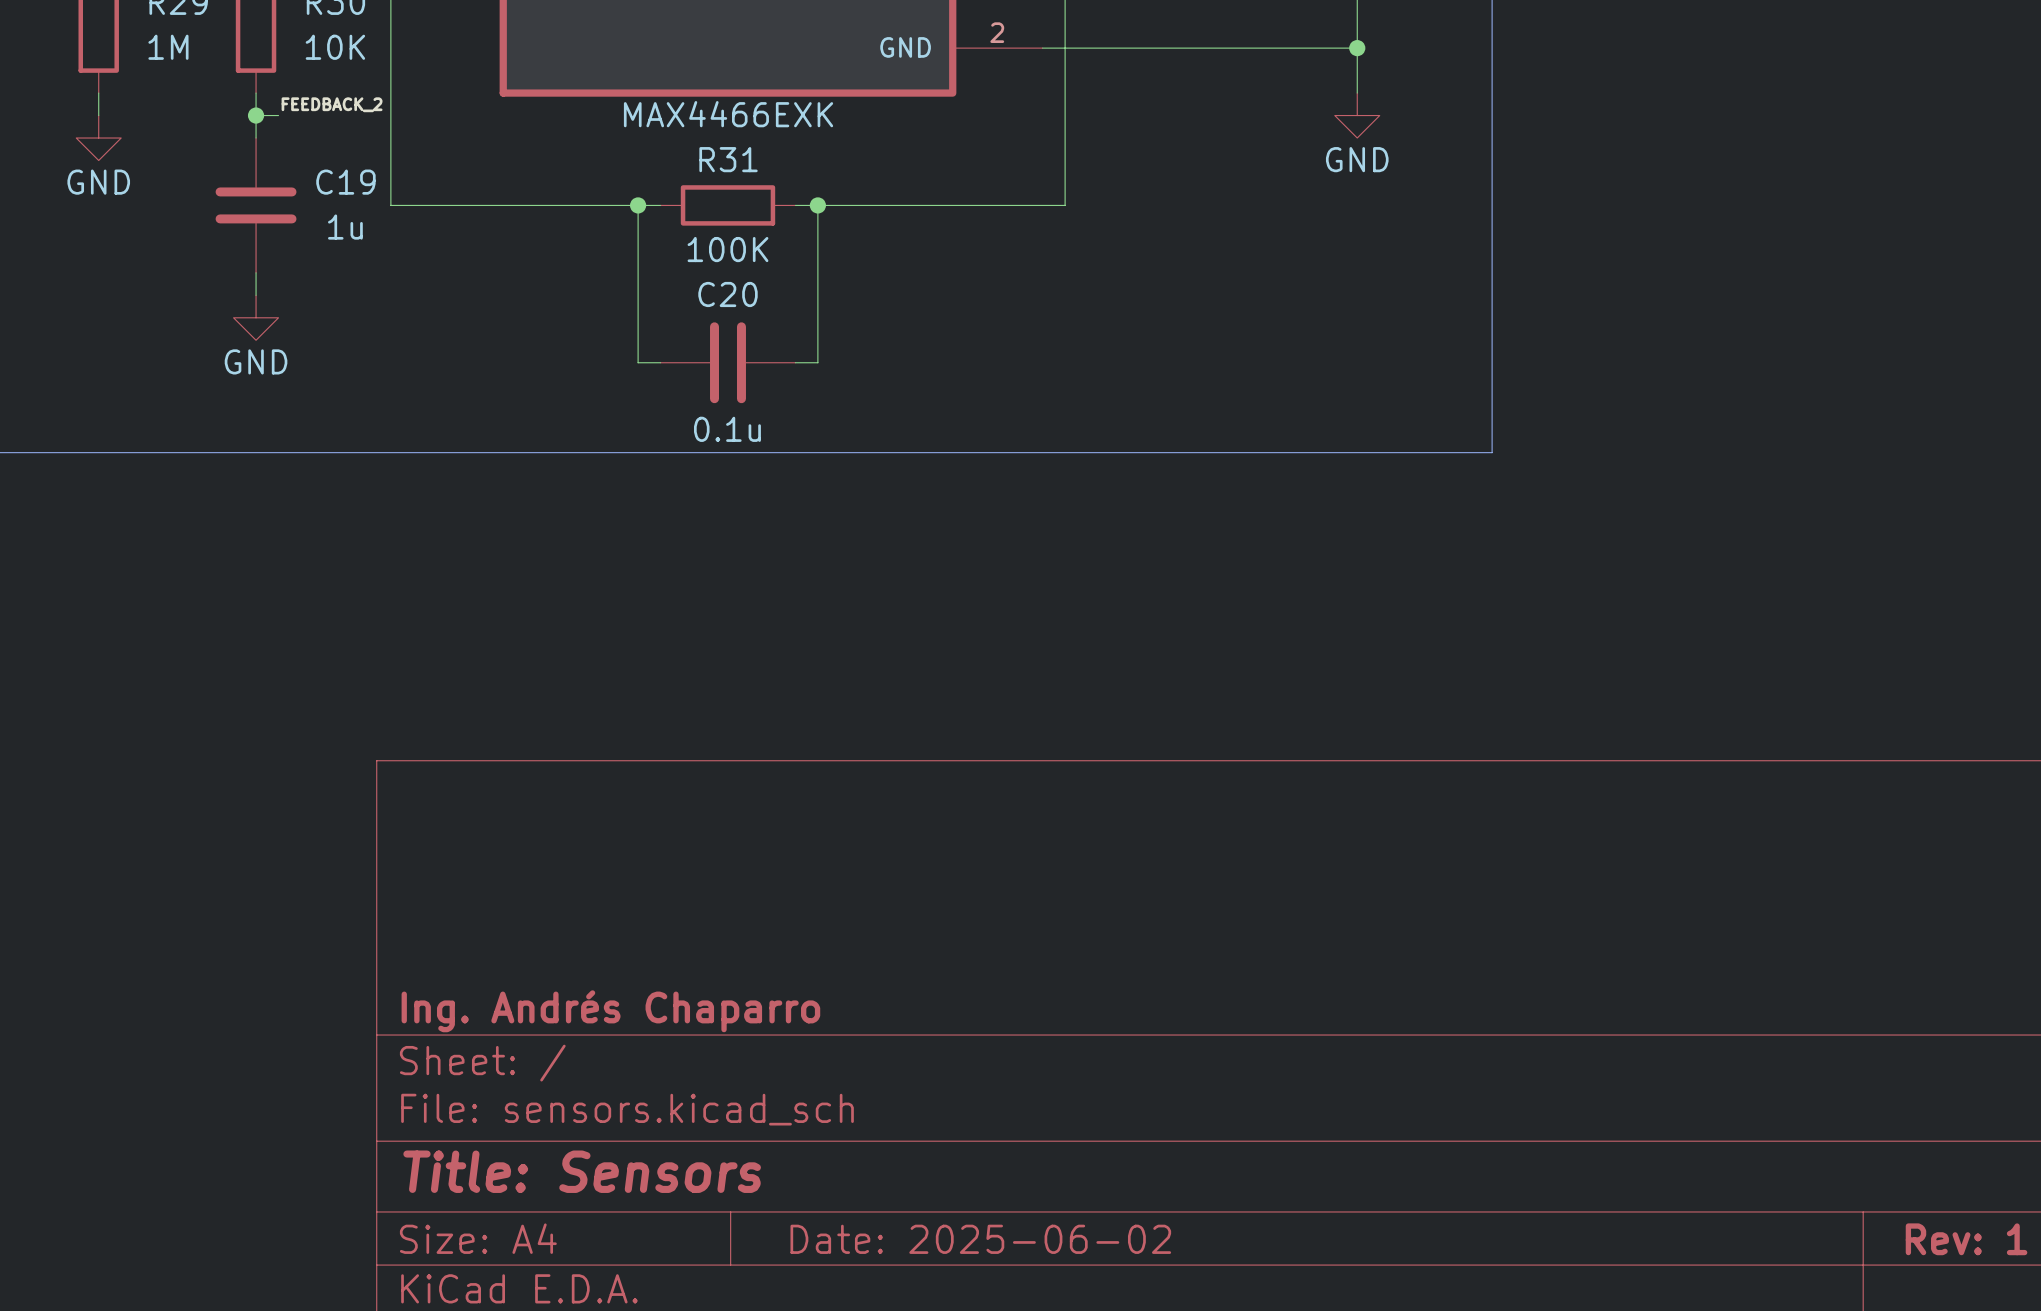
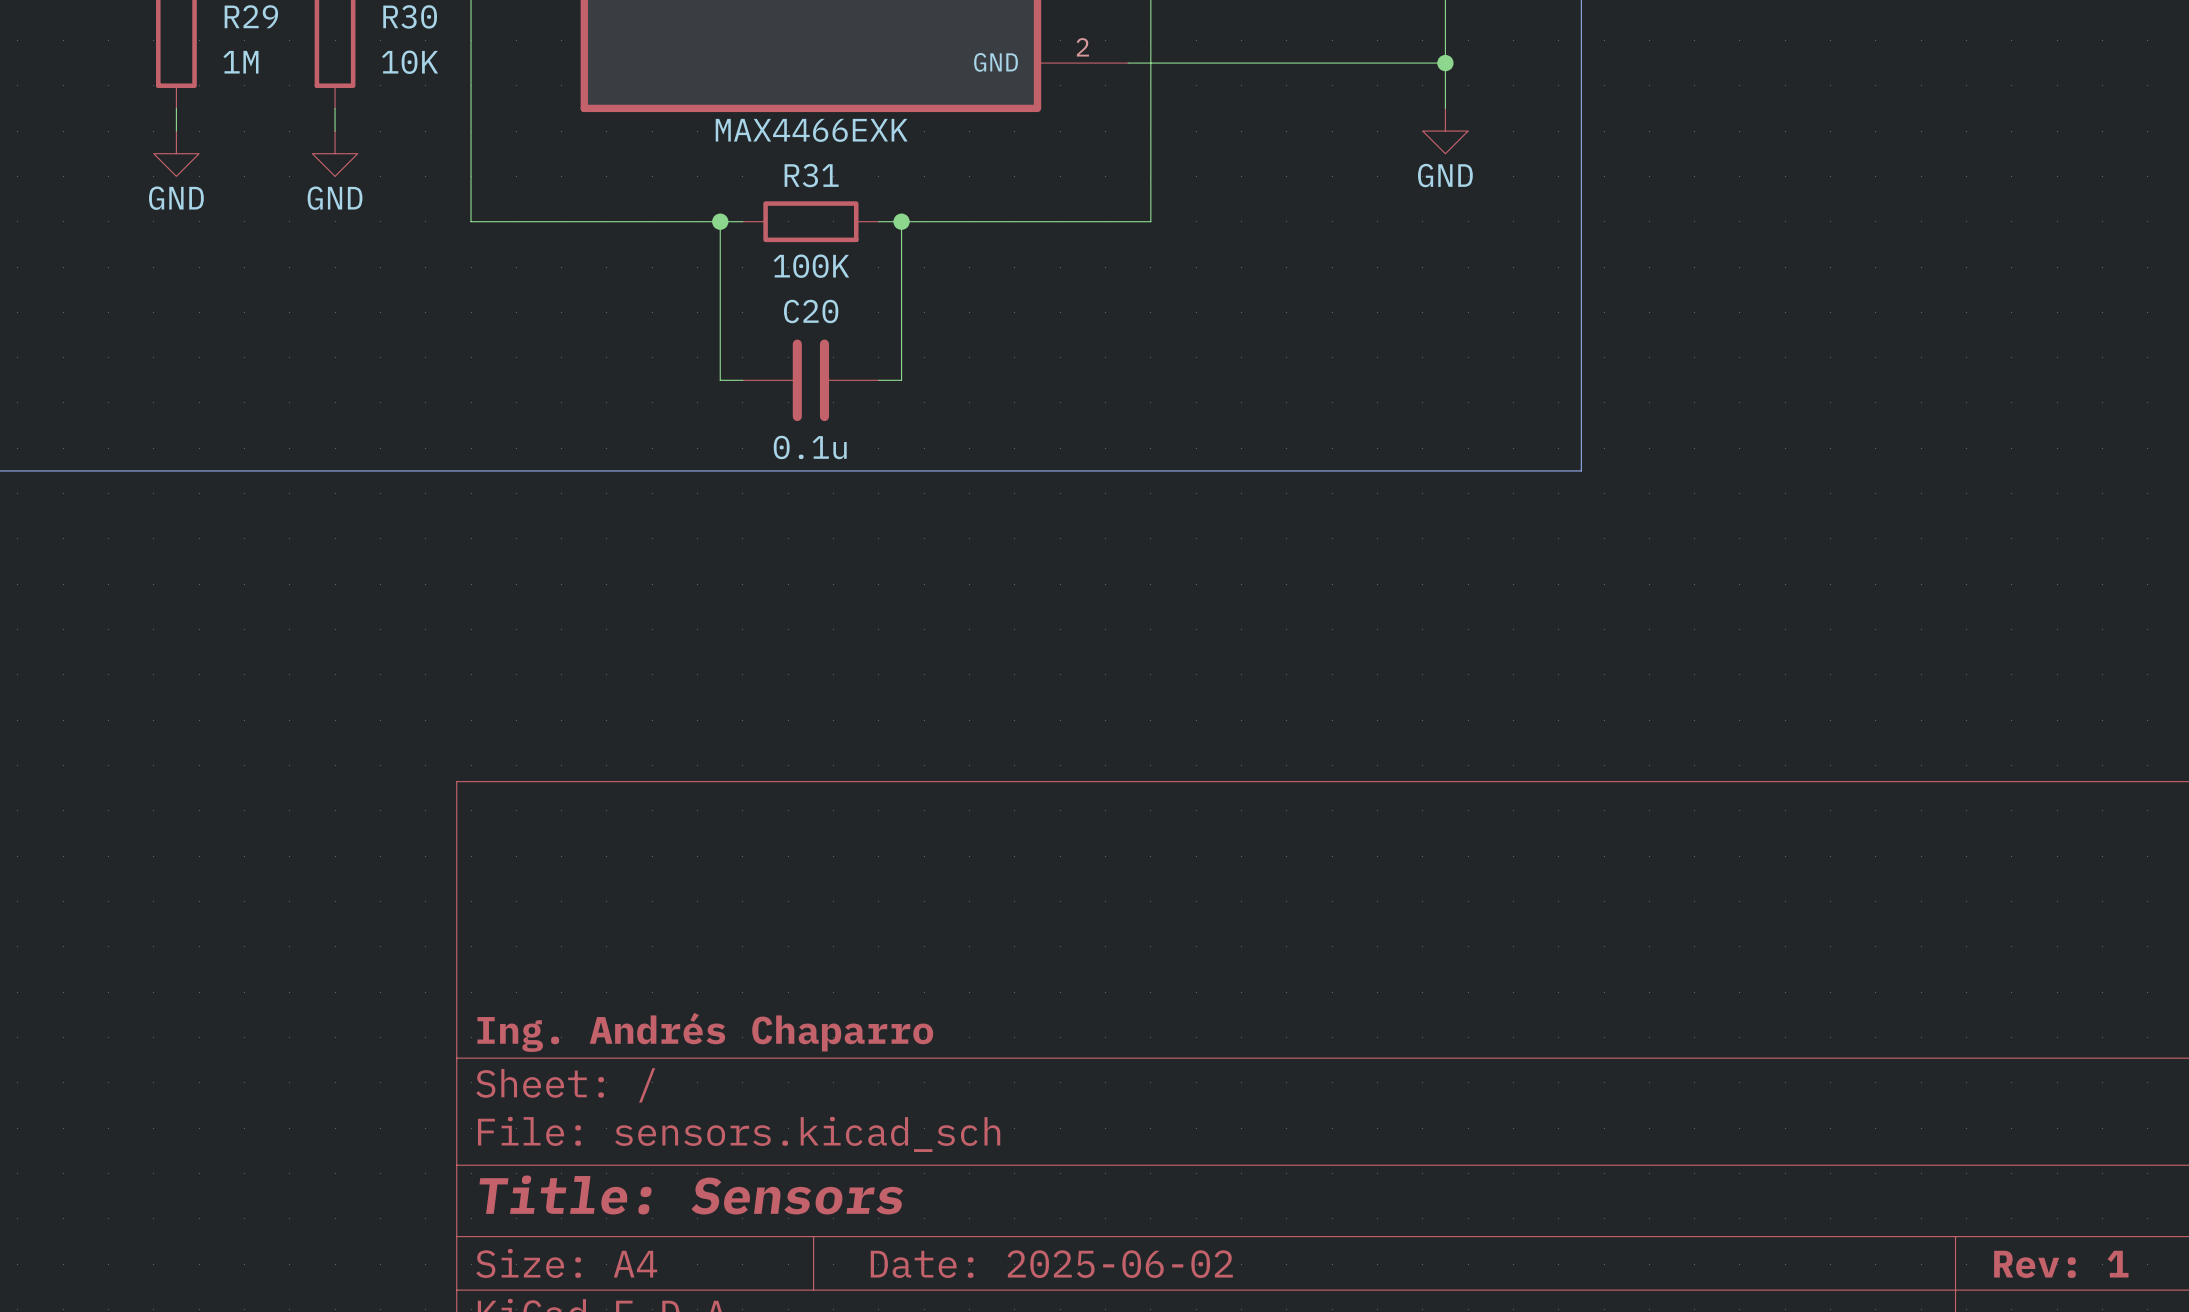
label: FEEDBACK_2 (332, 104) -> none
junction: (256, 115) -> none
wire: (278, 115) (256, 115) (256, 138) -> none
C19: 1u (256, 205) -> none
wire: (256, 272) (256, 295) -> none
power symbol position: GND (256, 317) -> GND (335, 153)

